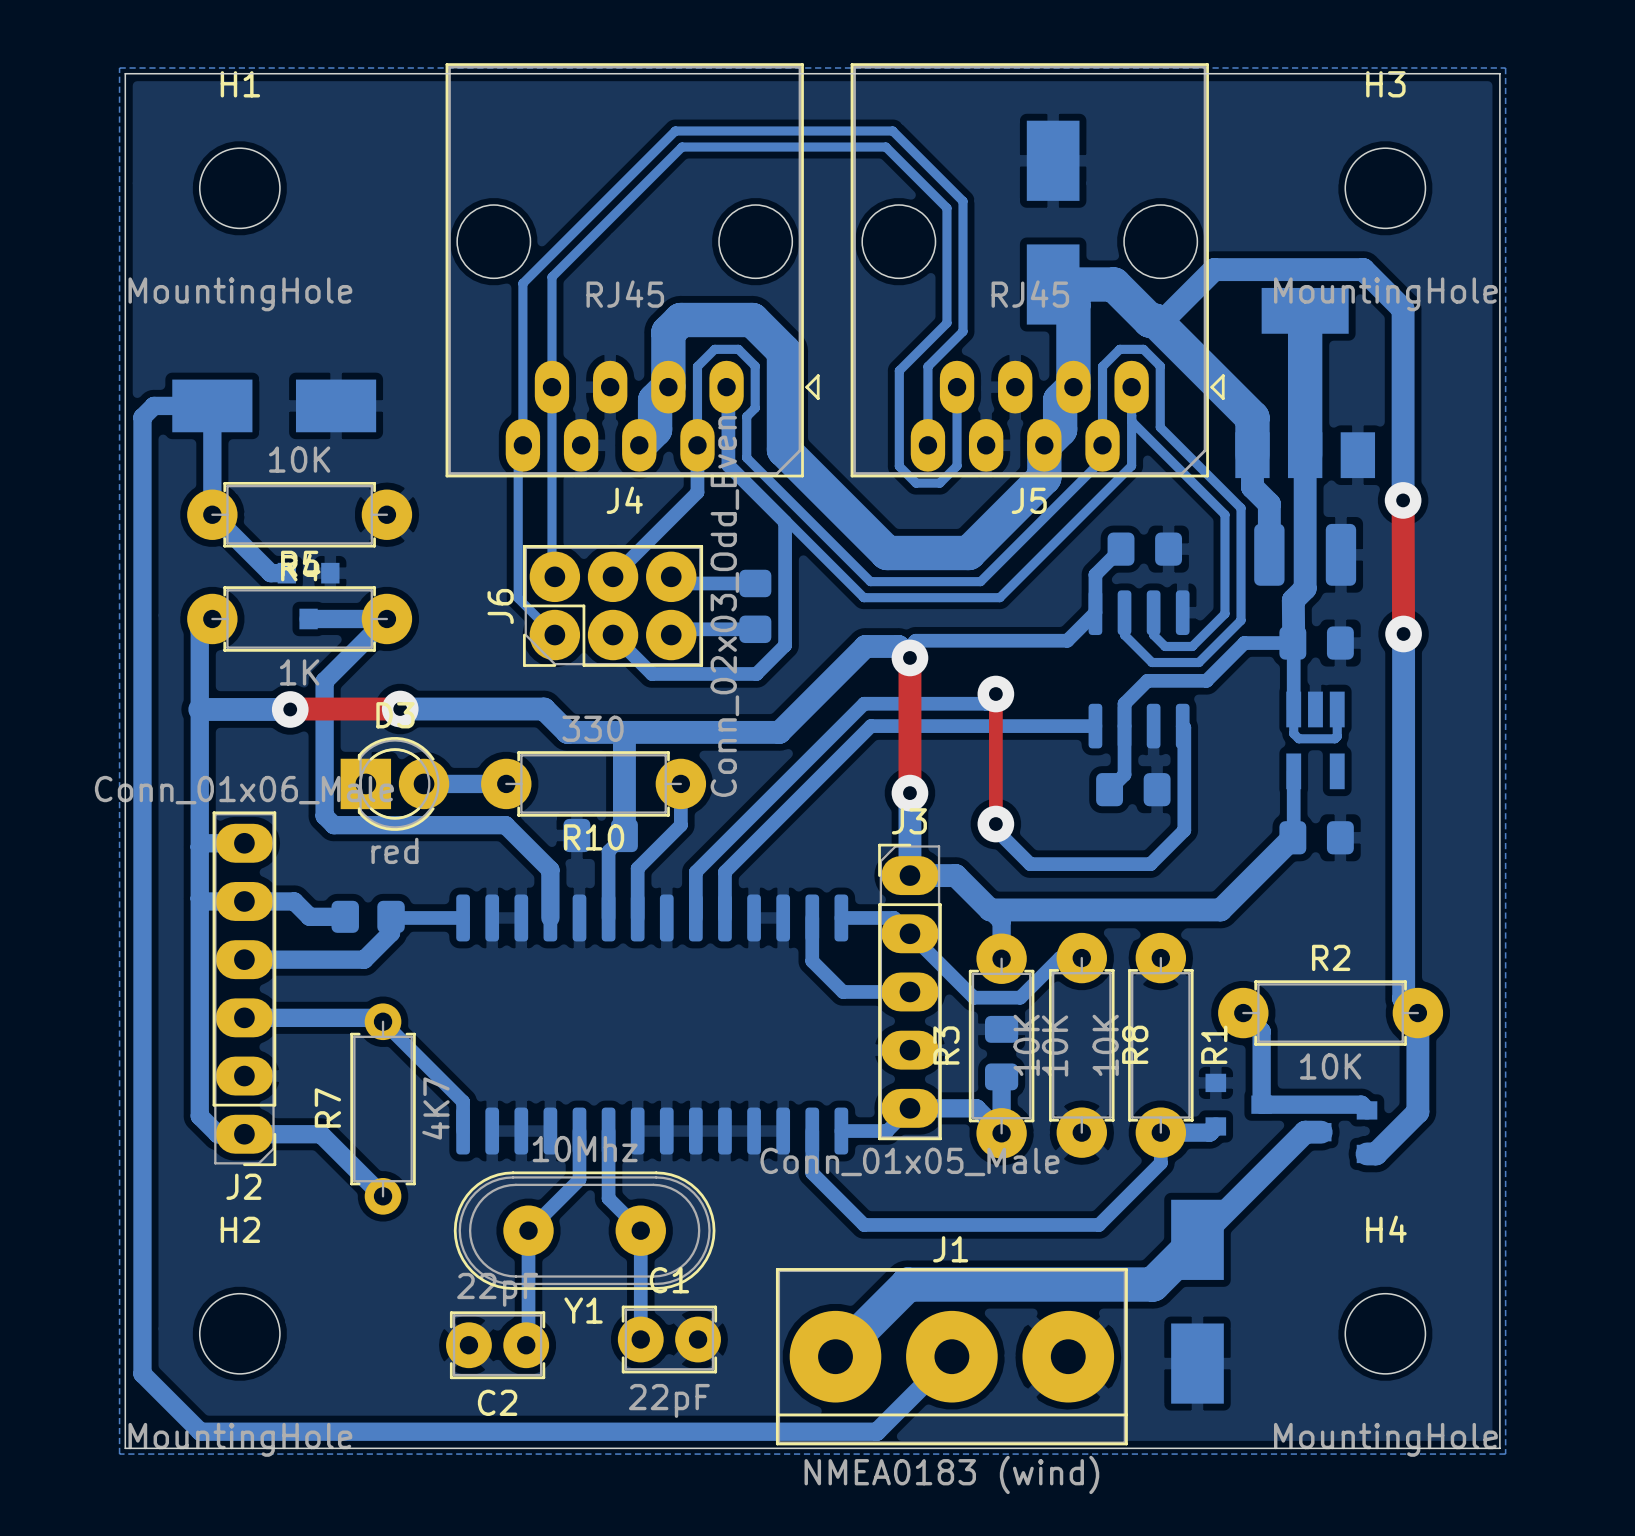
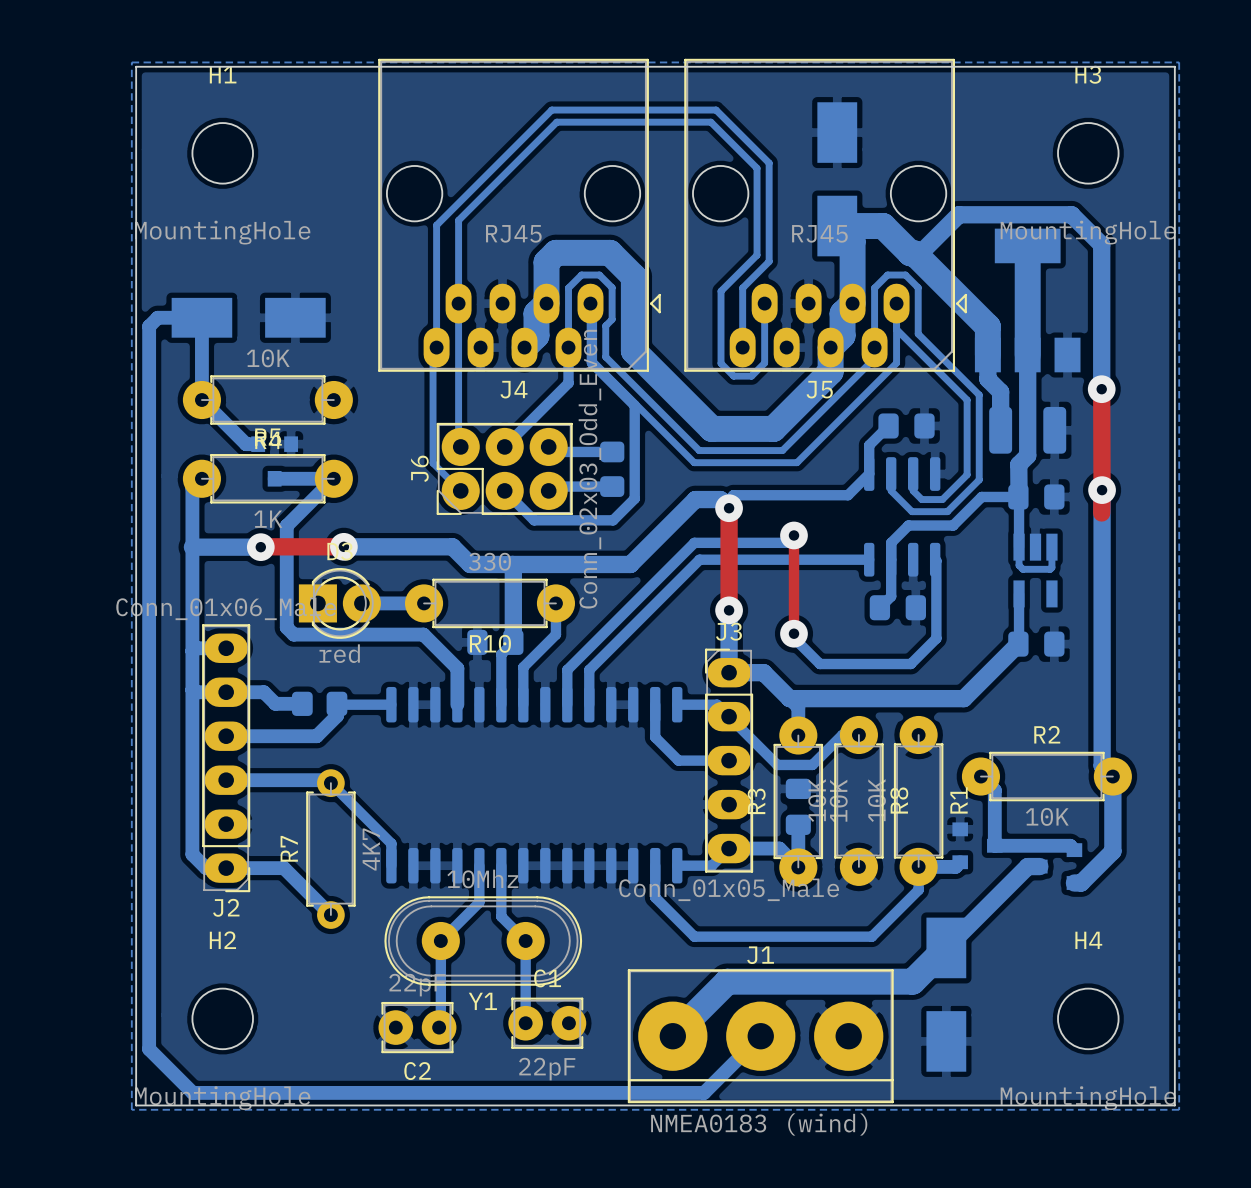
top track: none -> (1102, 490) (1101, 512)

